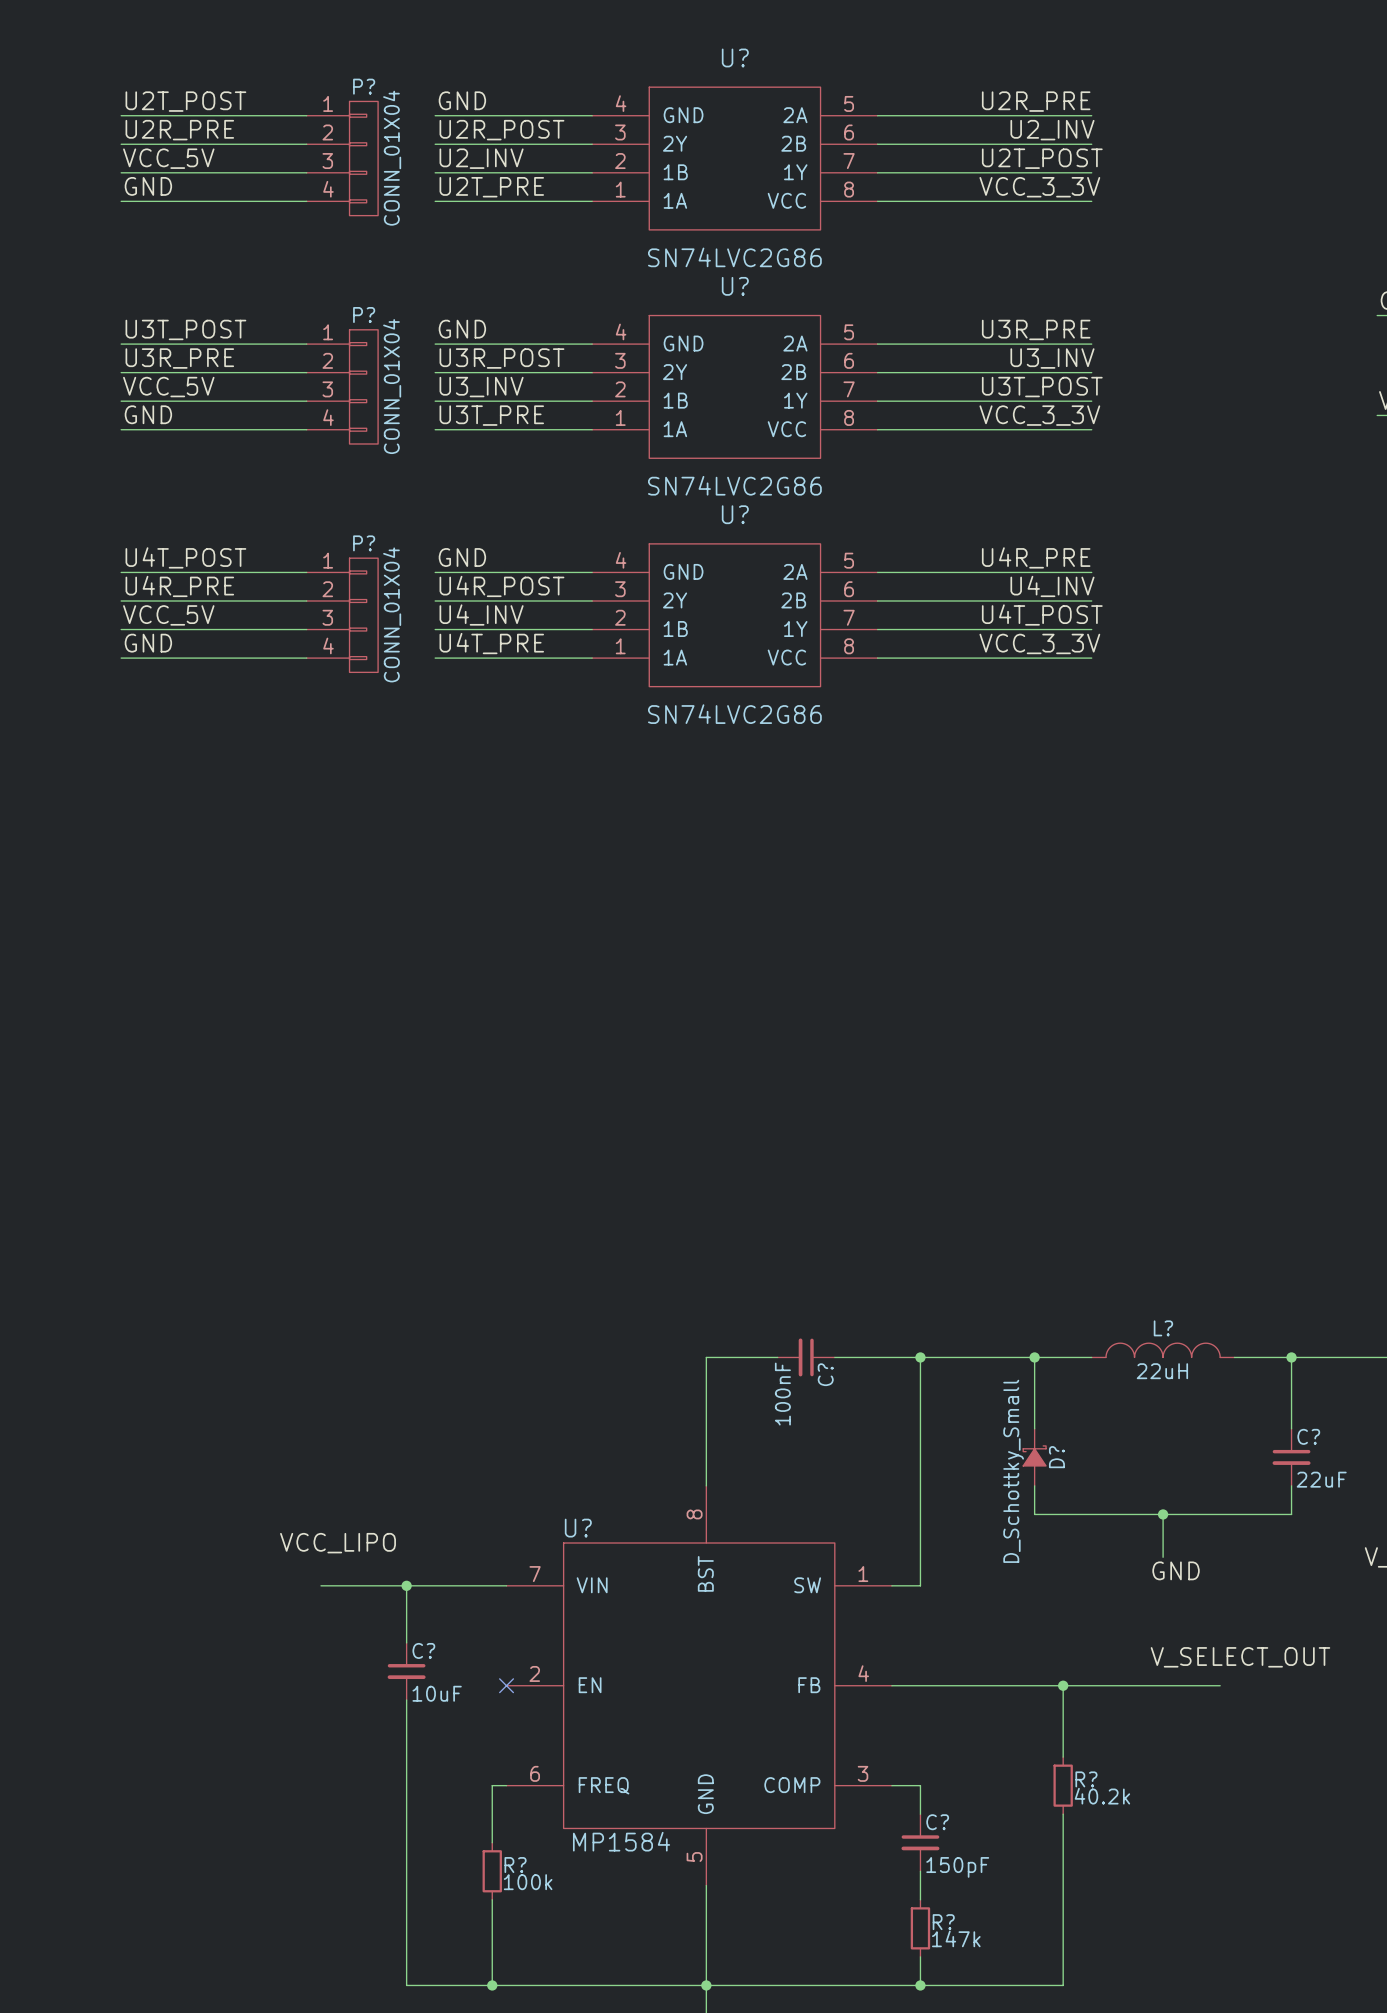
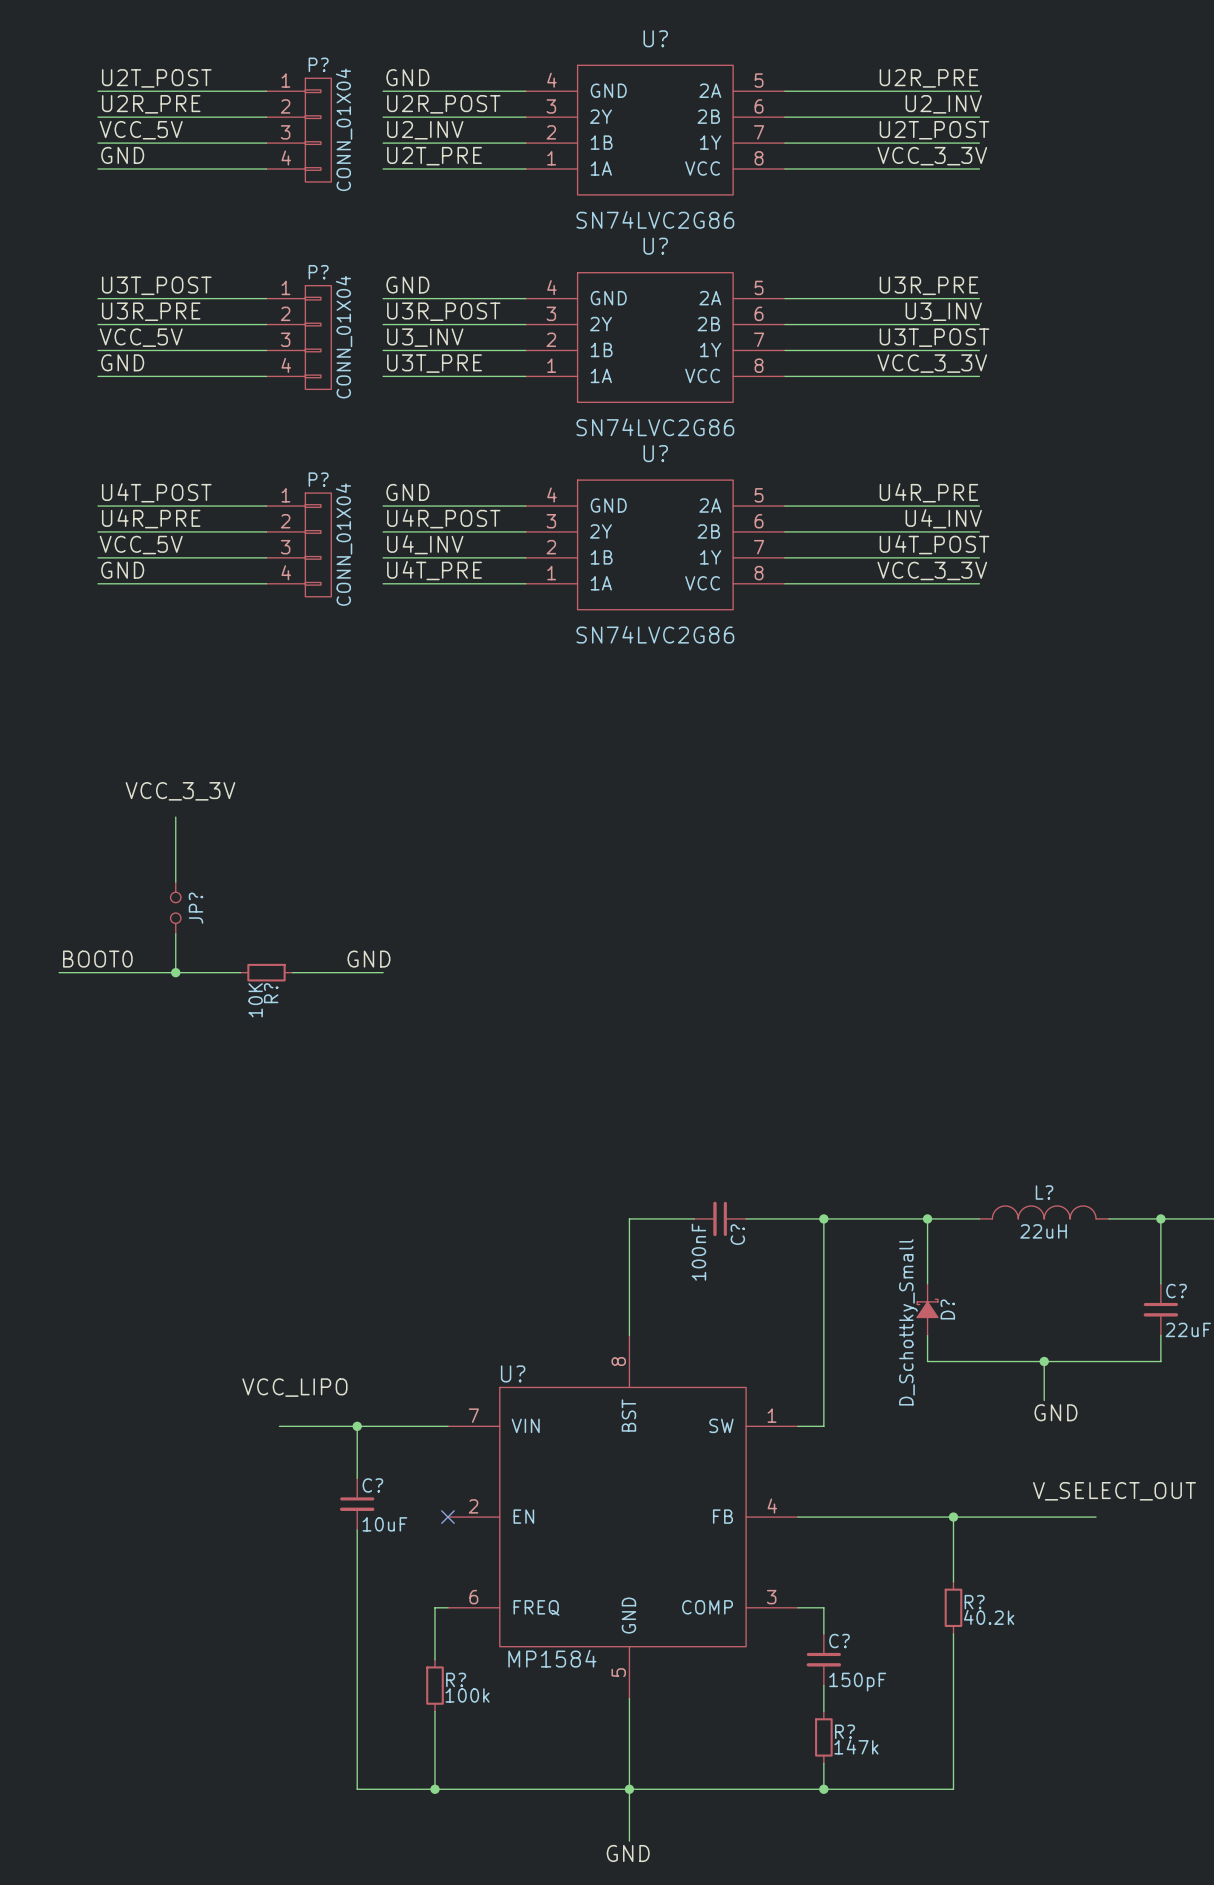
label: none -> VCC_3_3V (180, 791)
wire: none -> (175, 817) (175, 881)
JP?: none -> (175, 907)
wire: none -> (175, 933) (175, 972)
label: none -> BOOT0 (97, 959)
label: none -> GND (368, 959)
wire: none -> (59, 972) (240, 972)
junction: none -> (175, 972)
R?: none -> 10K (266, 972)
wire: none -> (292, 972) (383, 972)

